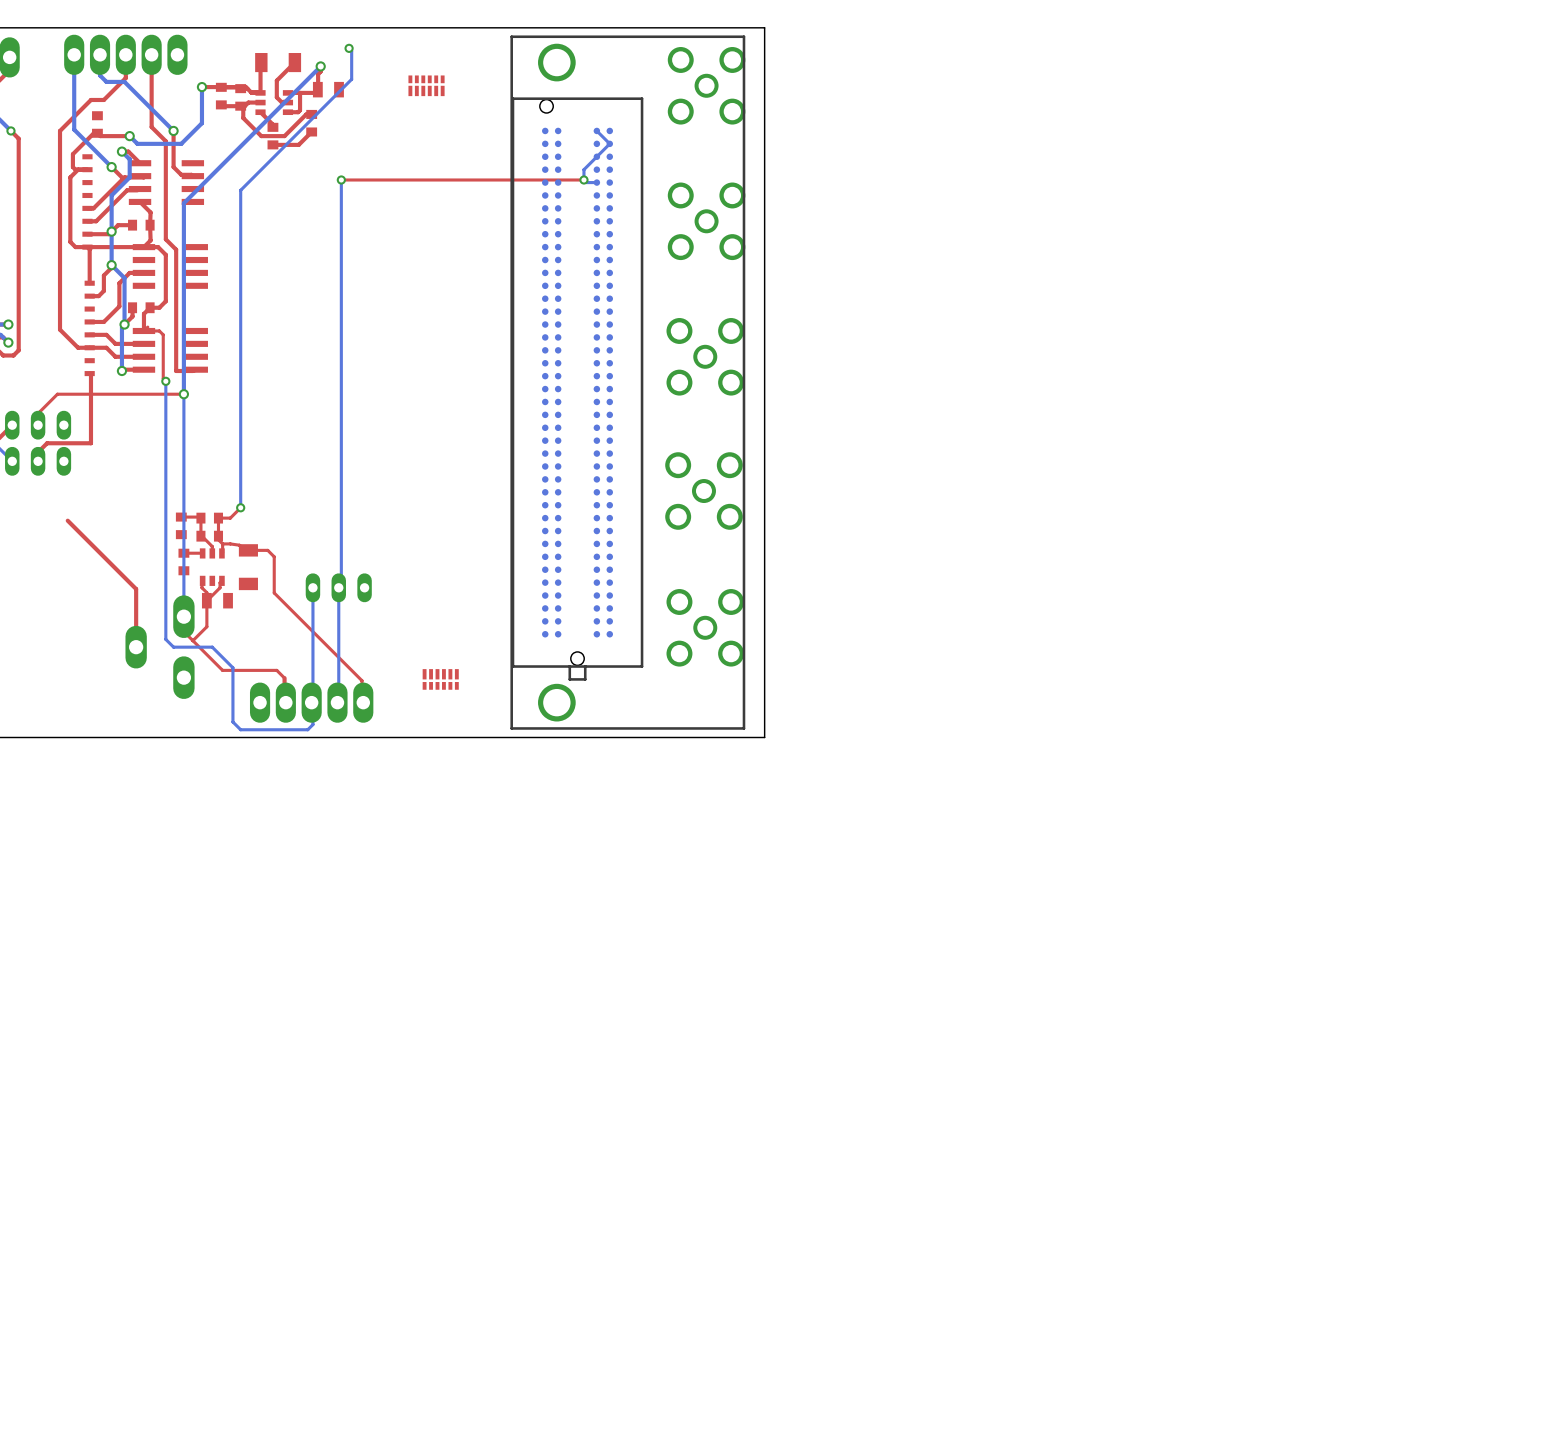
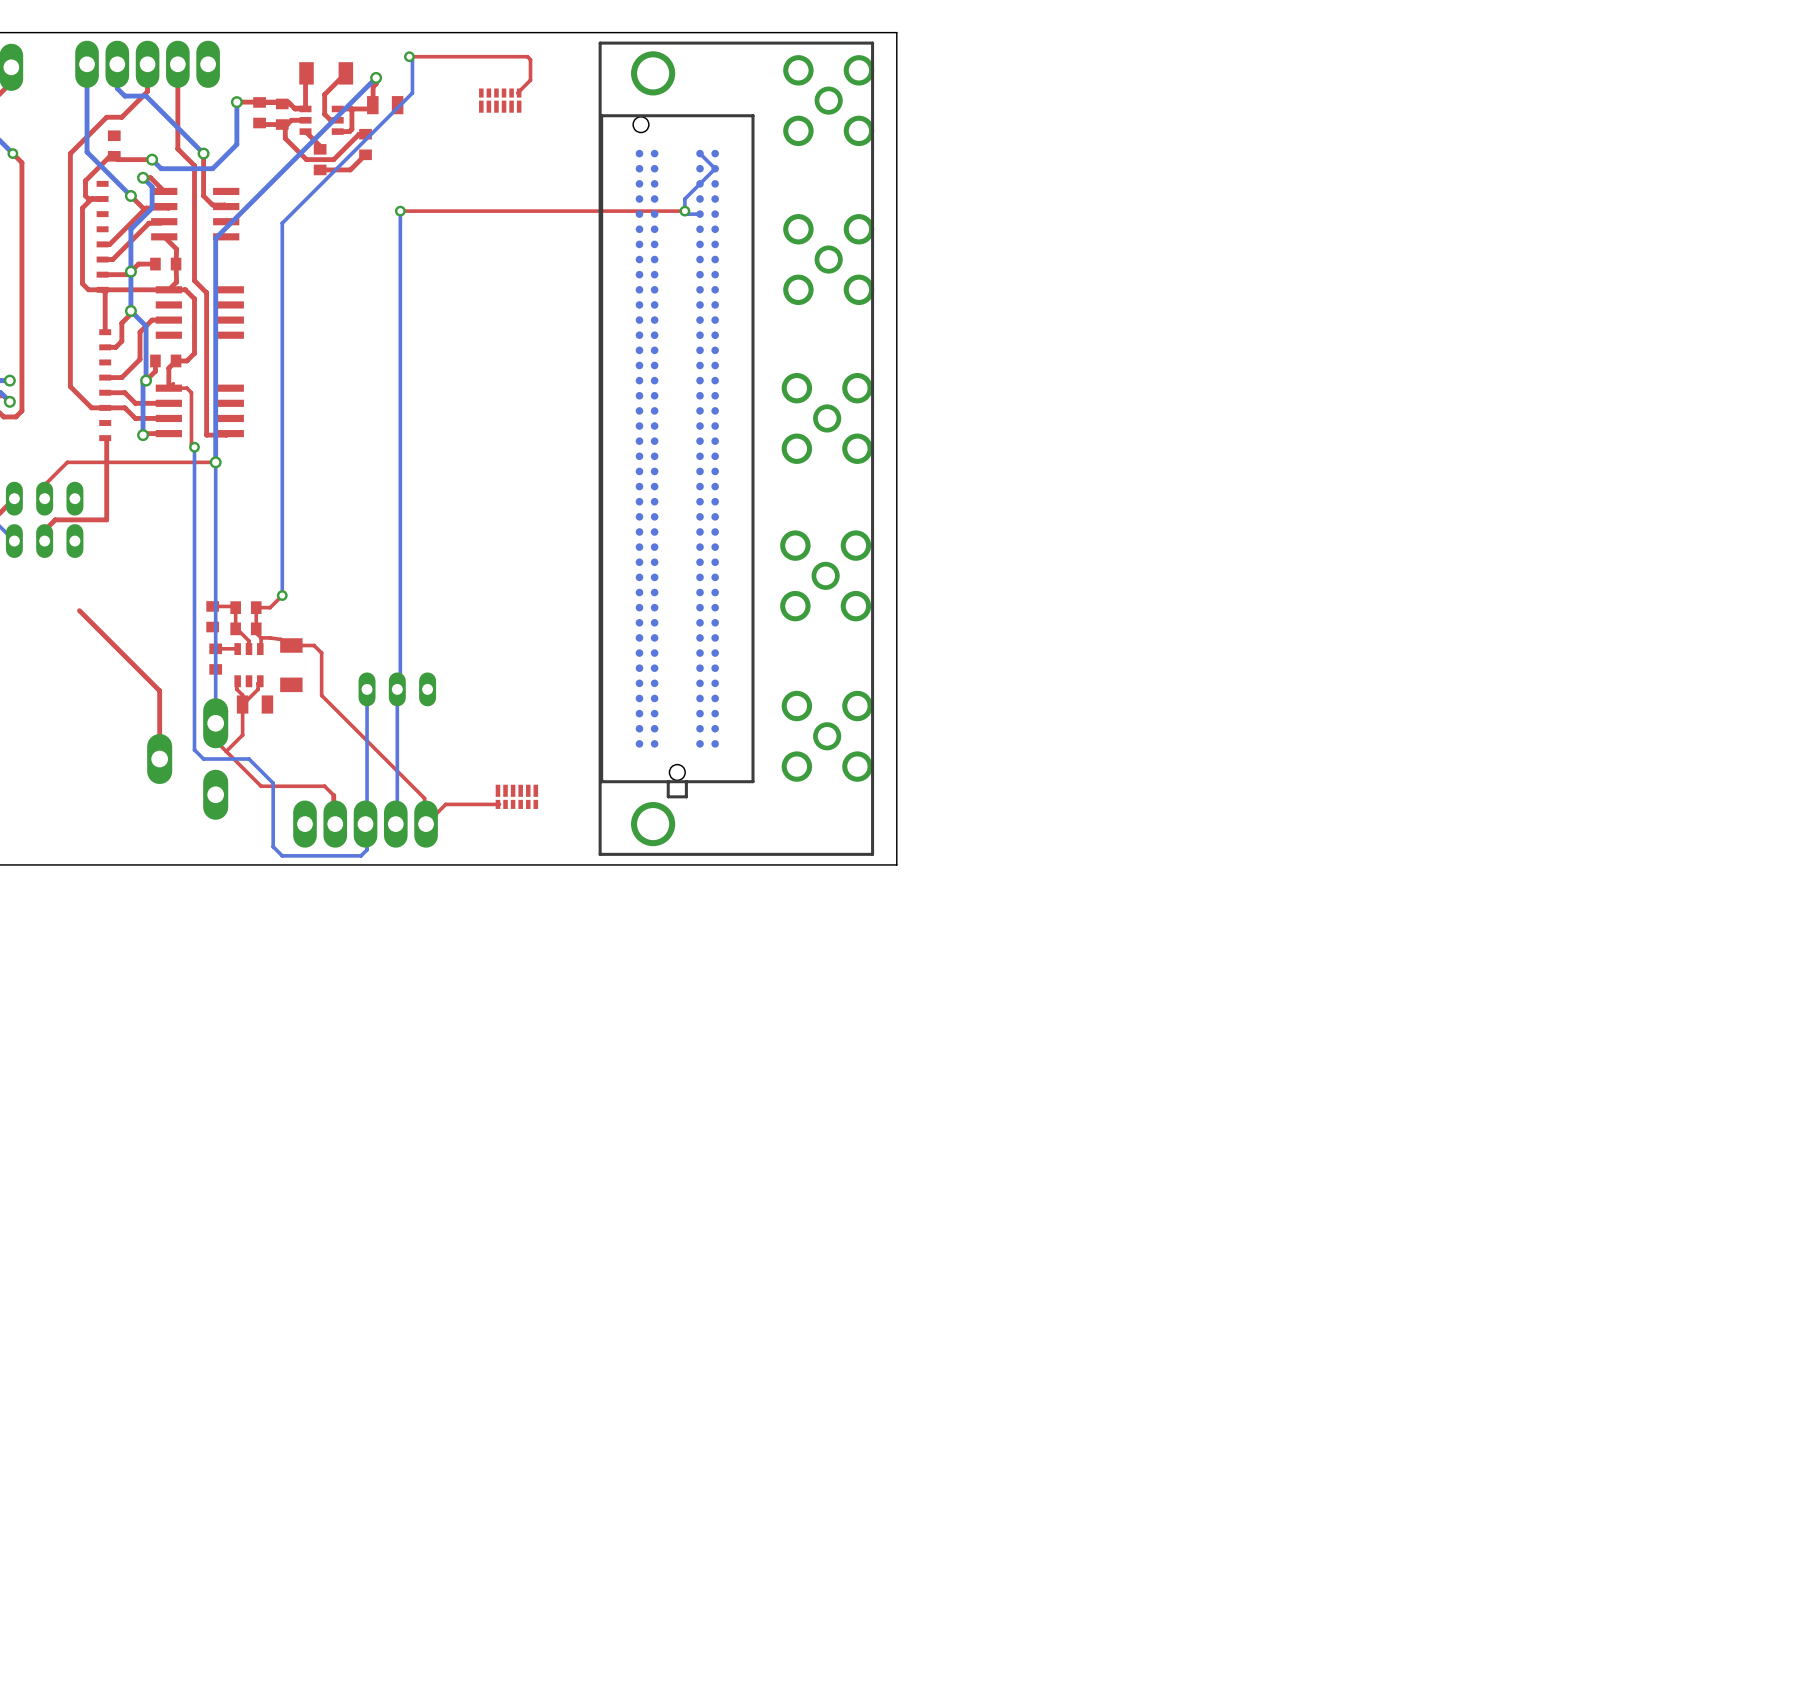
top track: none -> (409, 56) (527, 56) (530, 59) (530, 80) (517, 93)
top track: none -> (499, 804) (445, 804) (426, 824)

